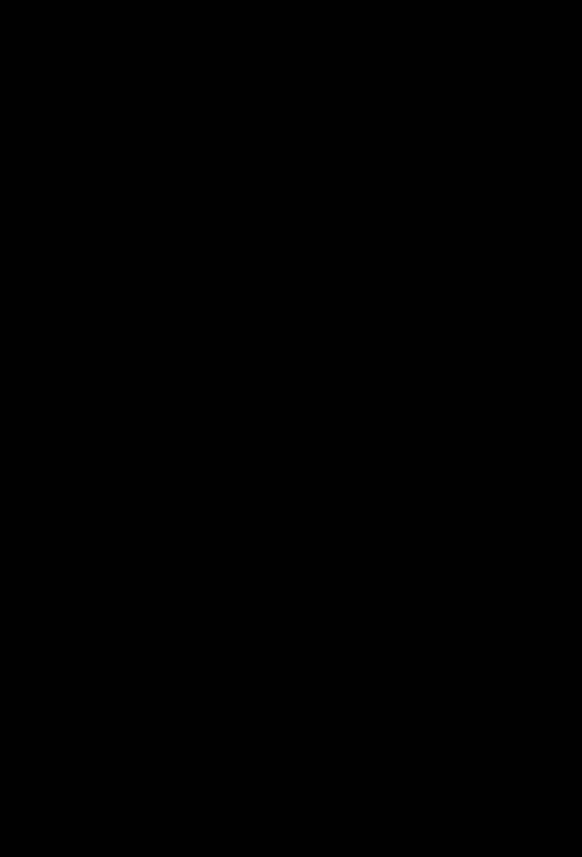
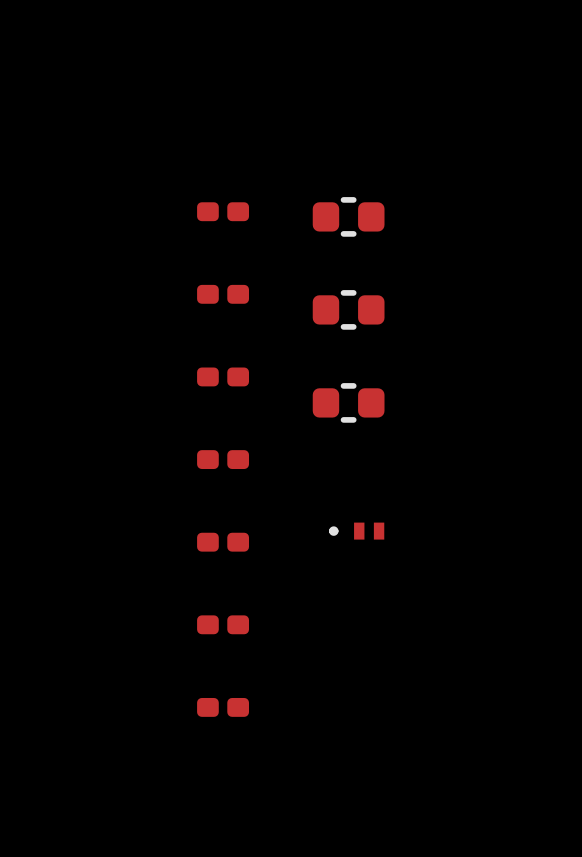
part: none -> (223, 211)
part: none -> (348, 216)
part: none -> (223, 294)
part: none -> (348, 309)
part: none -> (223, 376)
part: none -> (348, 402)
part: none -> (223, 459)
part: none -> (356, 531)
part: none -> (223, 542)
part: none -> (223, 624)
part: none -> (223, 707)

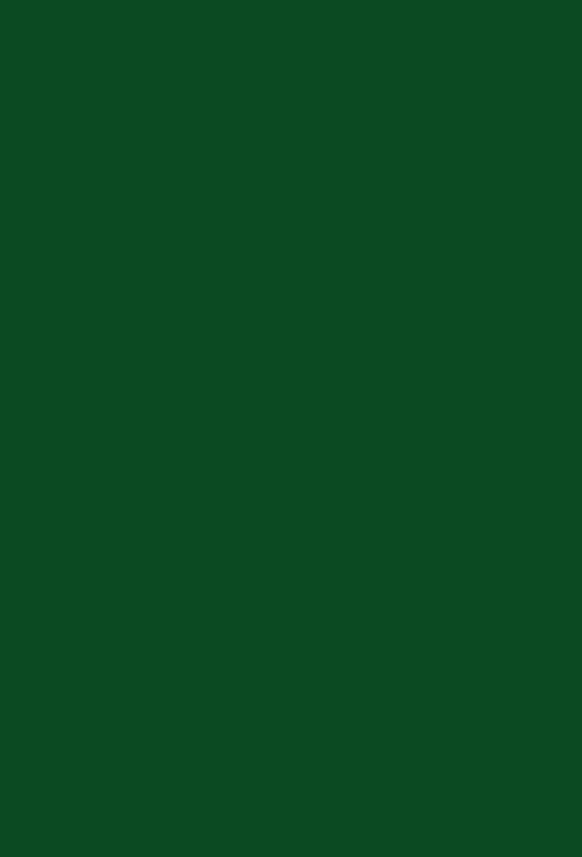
part: (223, 211) -> none
part: (348, 216) -> none
part: (223, 294) -> none
part: (348, 309) -> none
part: (223, 376) -> none
part: (348, 402) -> none
part: (223, 459) -> none
part: (356, 531) -> none
part: (223, 542) -> none
part: (223, 624) -> none
part: (223, 707) -> none

